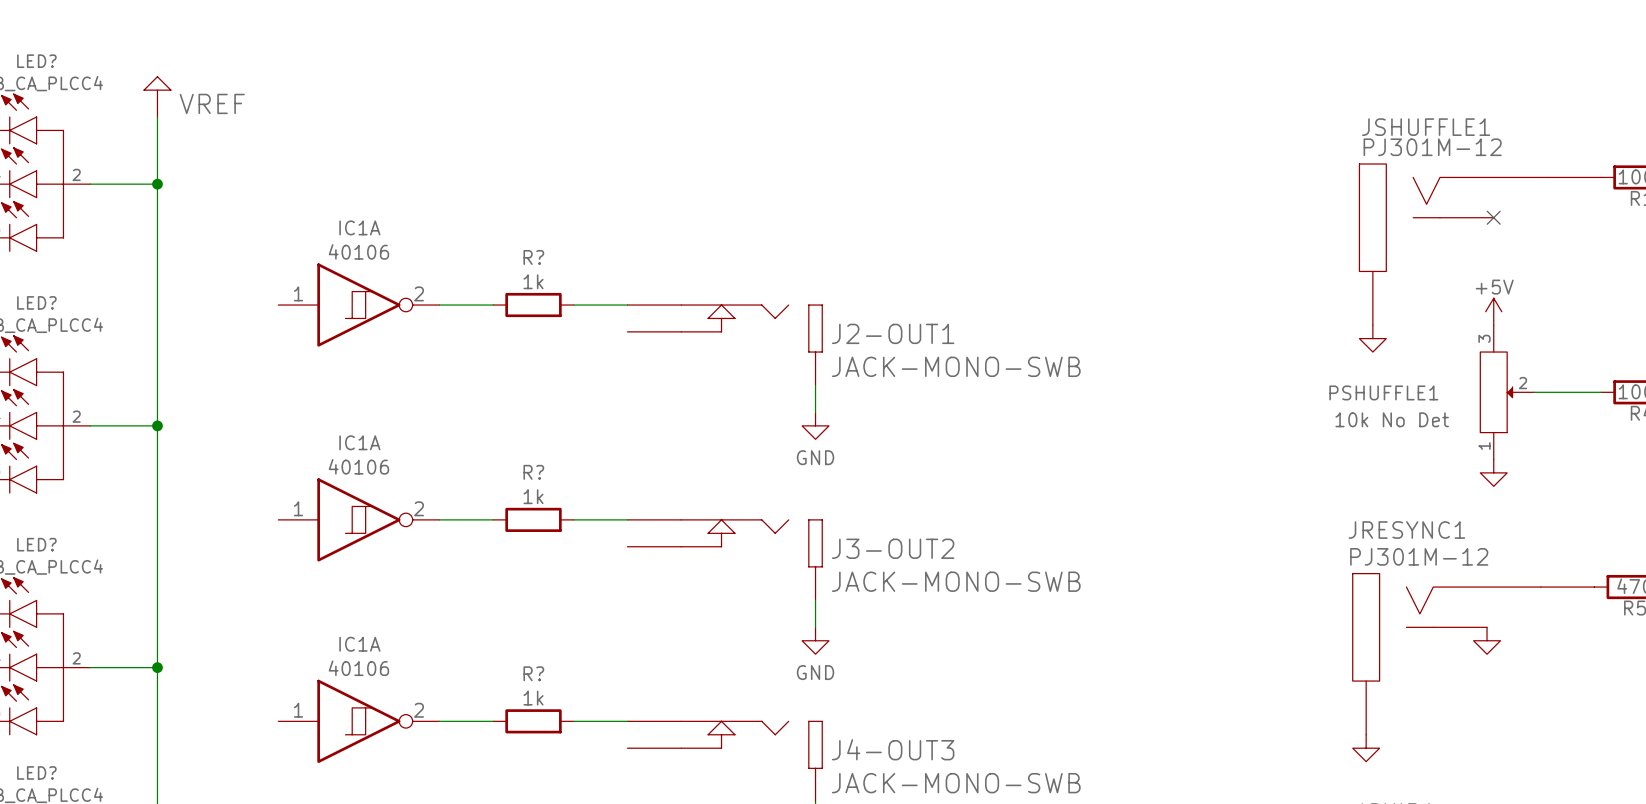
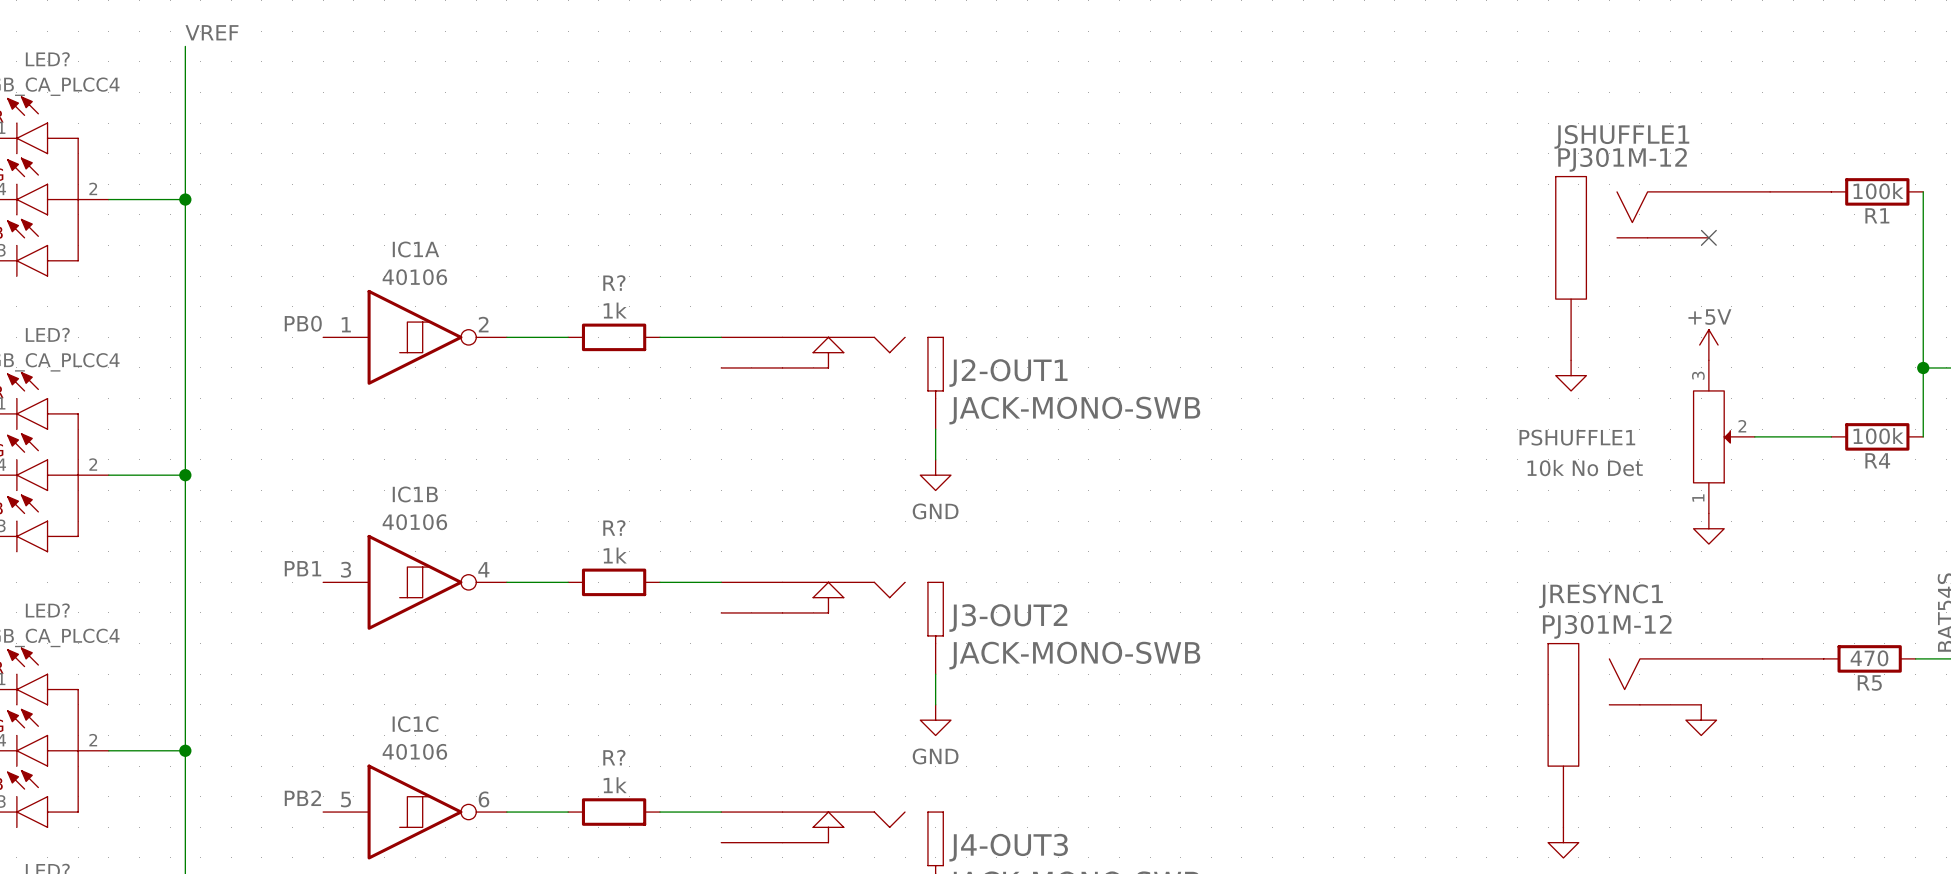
label: none -> VREF (211, 32)
wire: none -> (185, 46) (185, 123)
power symbol: VREF (157, 96) -> none
label: none -> PB0 (303, 323)
IC1A name: IC1A (359, 442) -> IC1B (415, 494)
label: none -> PB1 (303, 568)
IC1A pin number: 1 (298, 508) -> 3 (346, 569)
IC1A pin number: 2 (419, 508) -> 4 (483, 569)
IC1A name: IC1A (359, 644) -> IC1C (415, 724)
label: none -> PB2 (302, 798)
IC1A pin number: 1 (298, 710) -> 5 (346, 799)
IC1A pin number: 2 (419, 710) -> 6 (484, 799)

